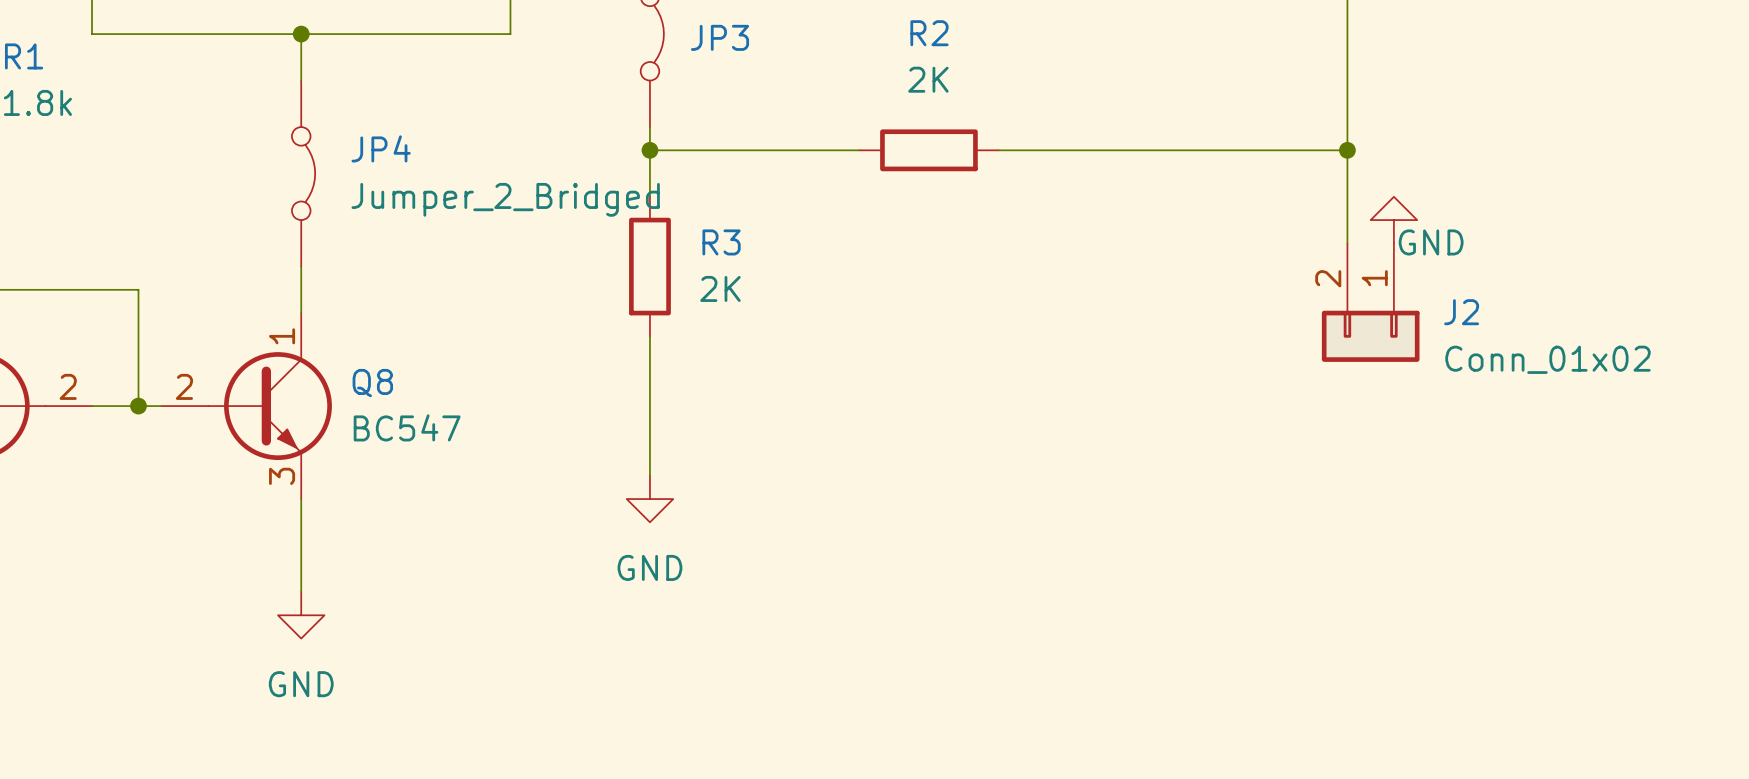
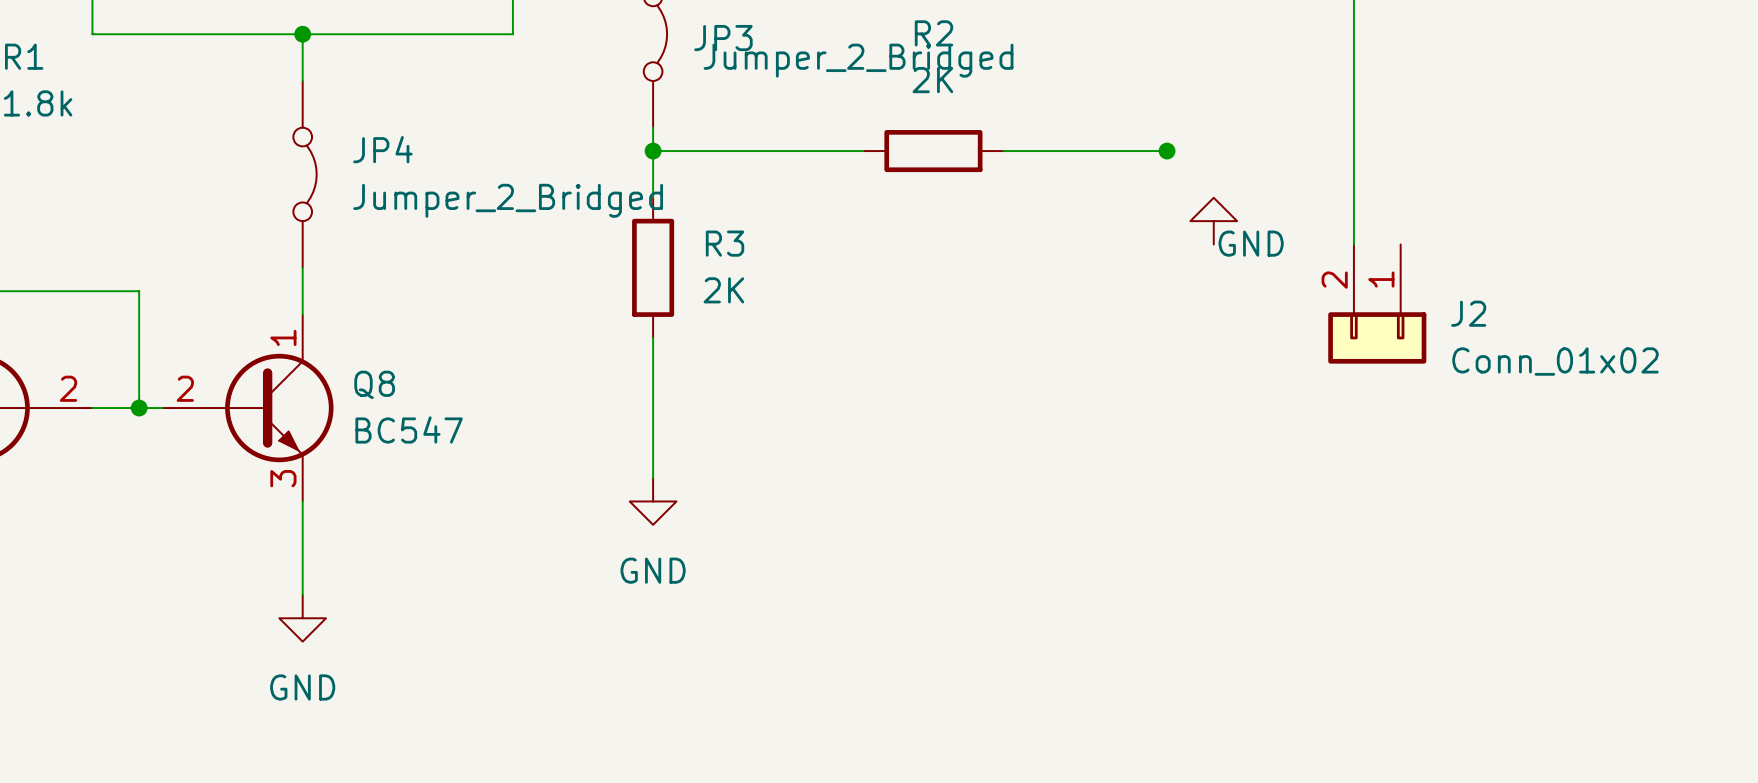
JP3 value: none -> Jumper_2_Bridged (858, 60)
wire: (1161, 150) (1347, 150) -> none
junction: none -> (1167, 151)
junction: (1347, 150) -> none
power symbol position: GND (1393, 220) -> GND (1213, 221)

